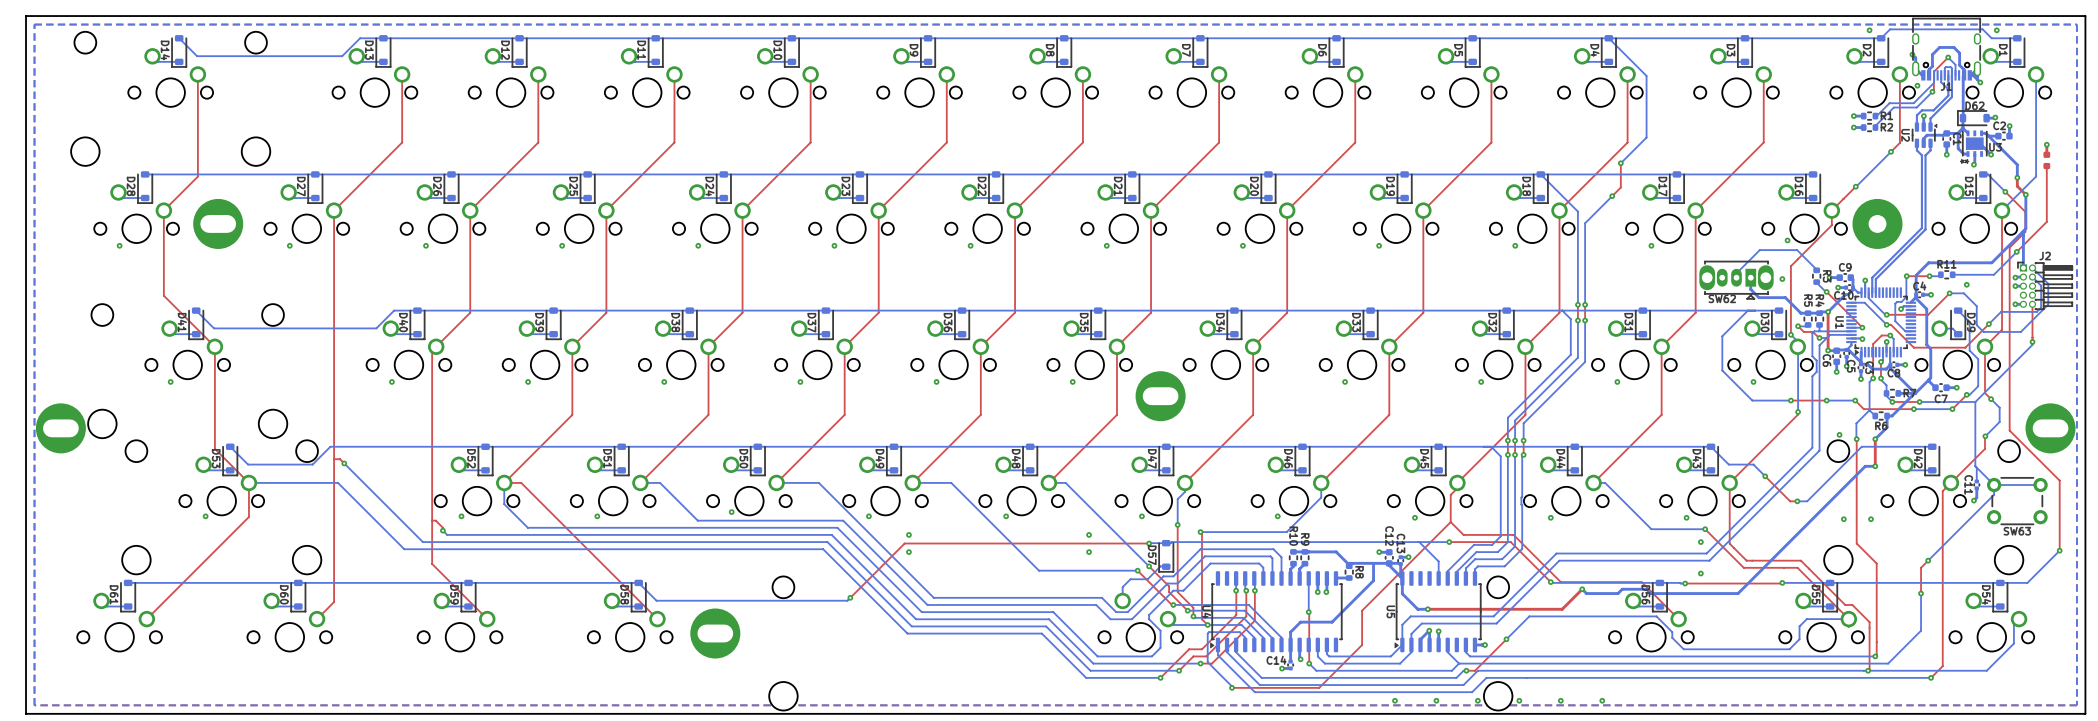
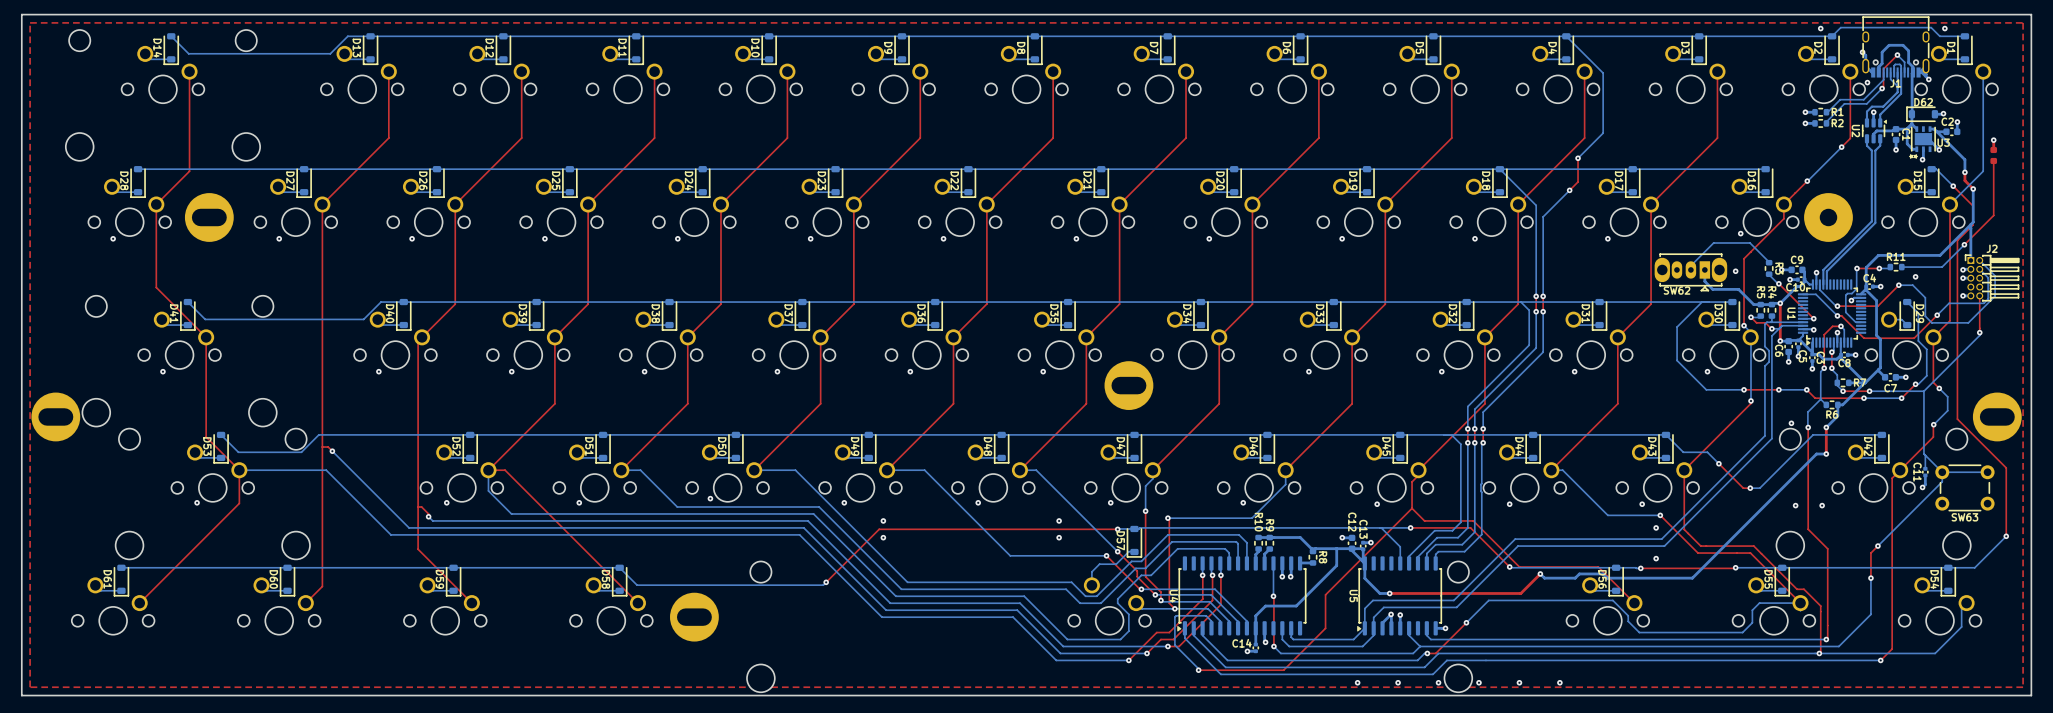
bottom zone outline: (2076, 24) (2076, 705) (34, 705) (34, 24) (2076, 24) -> none

